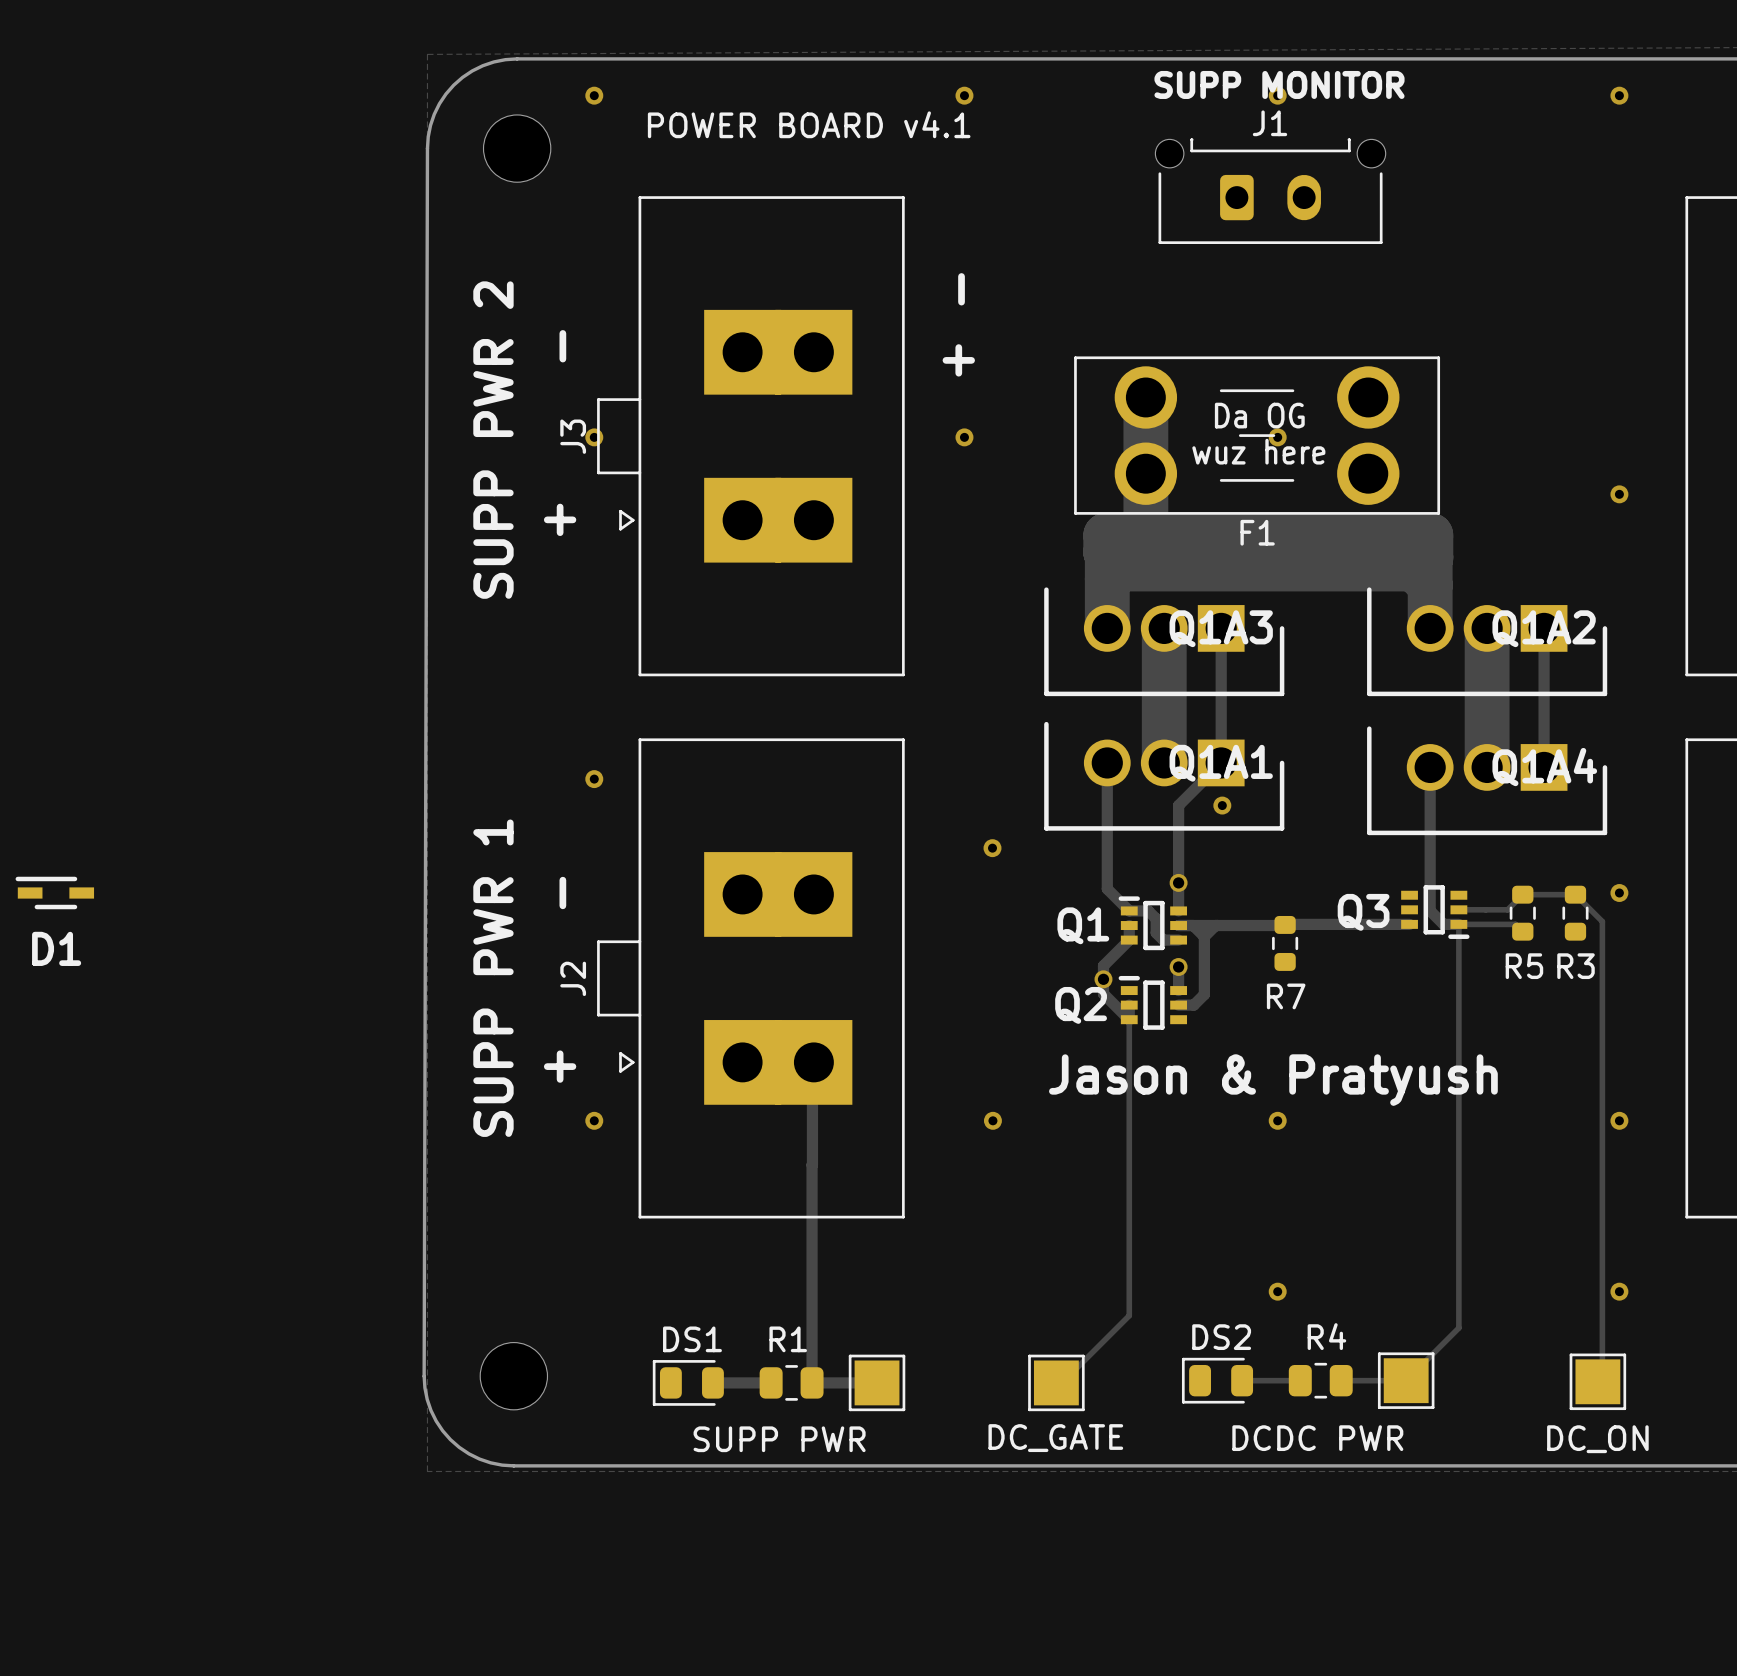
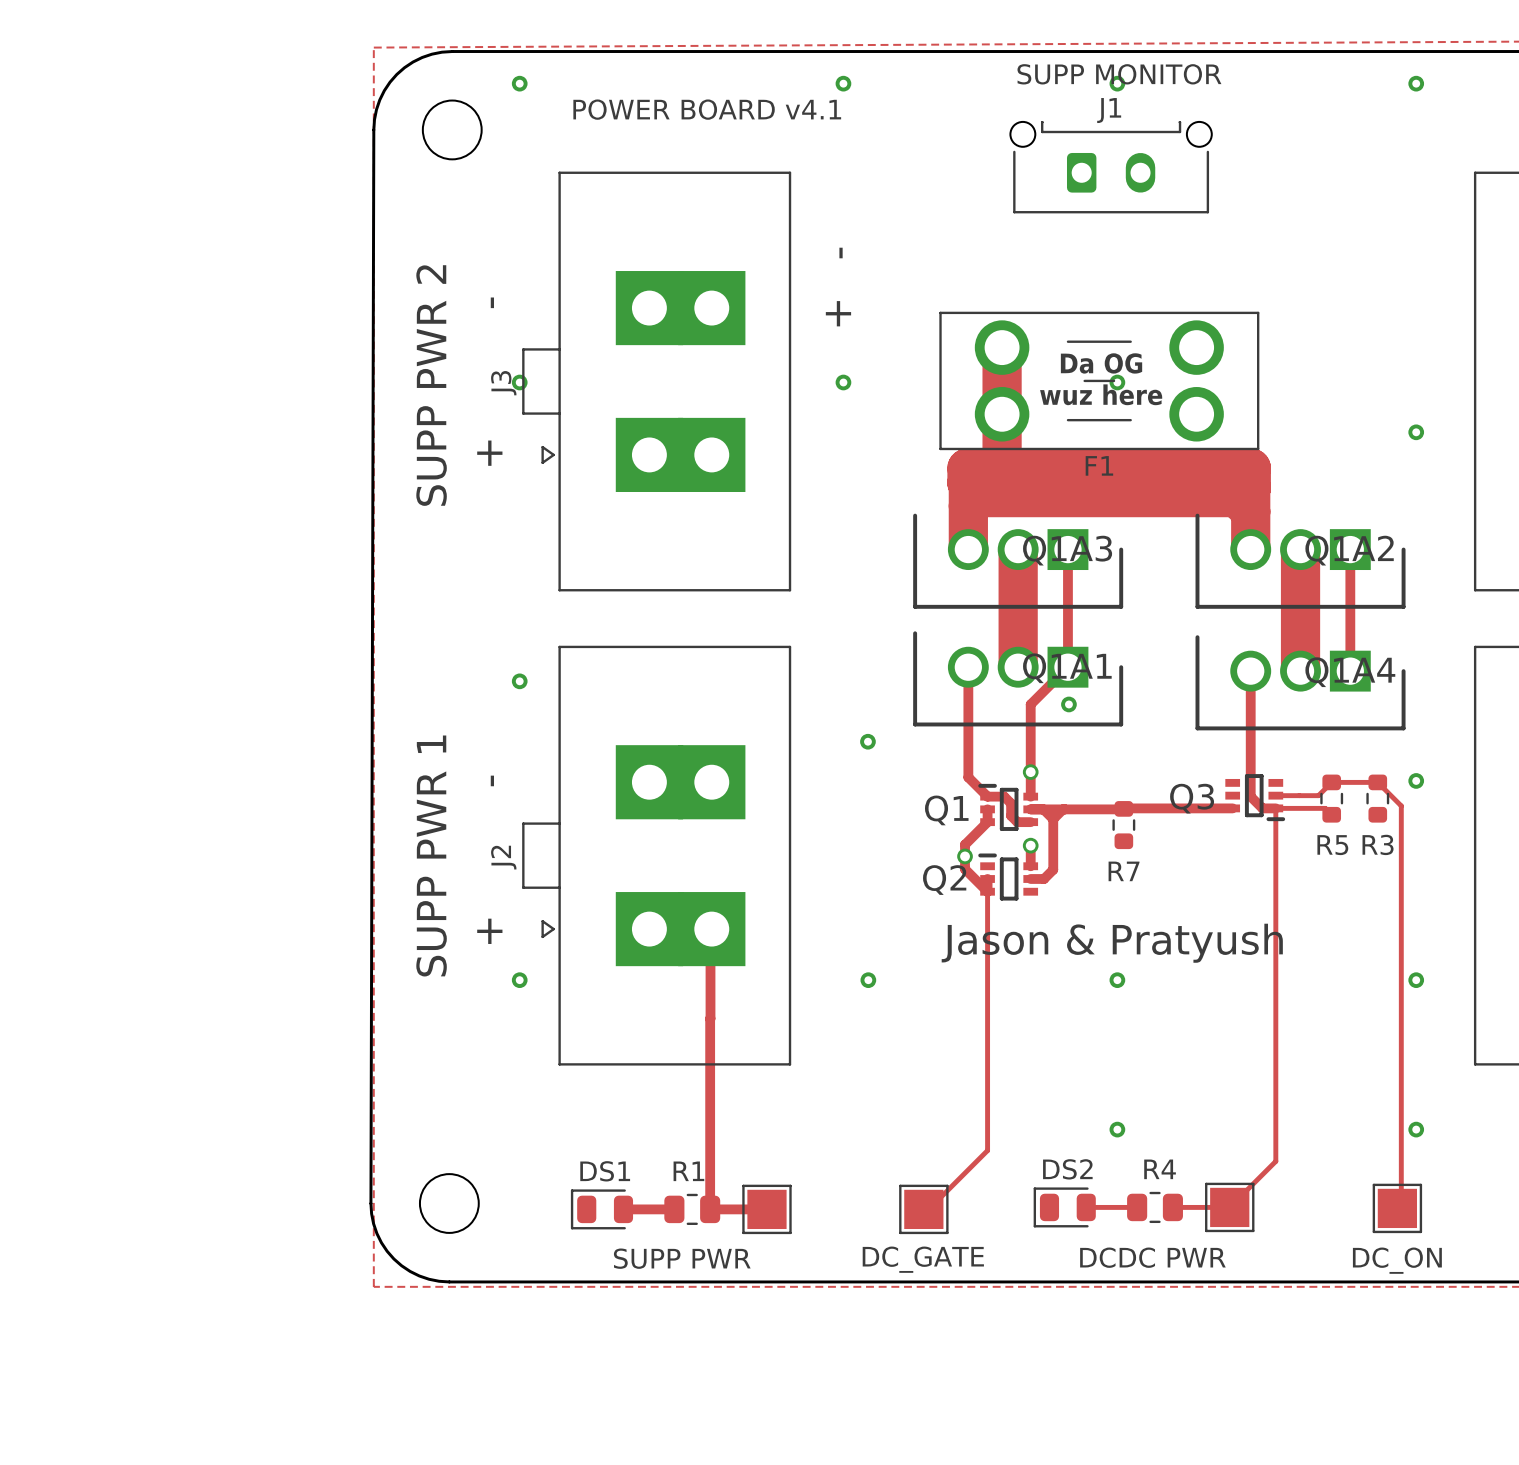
D1: (54, 893) -> none

